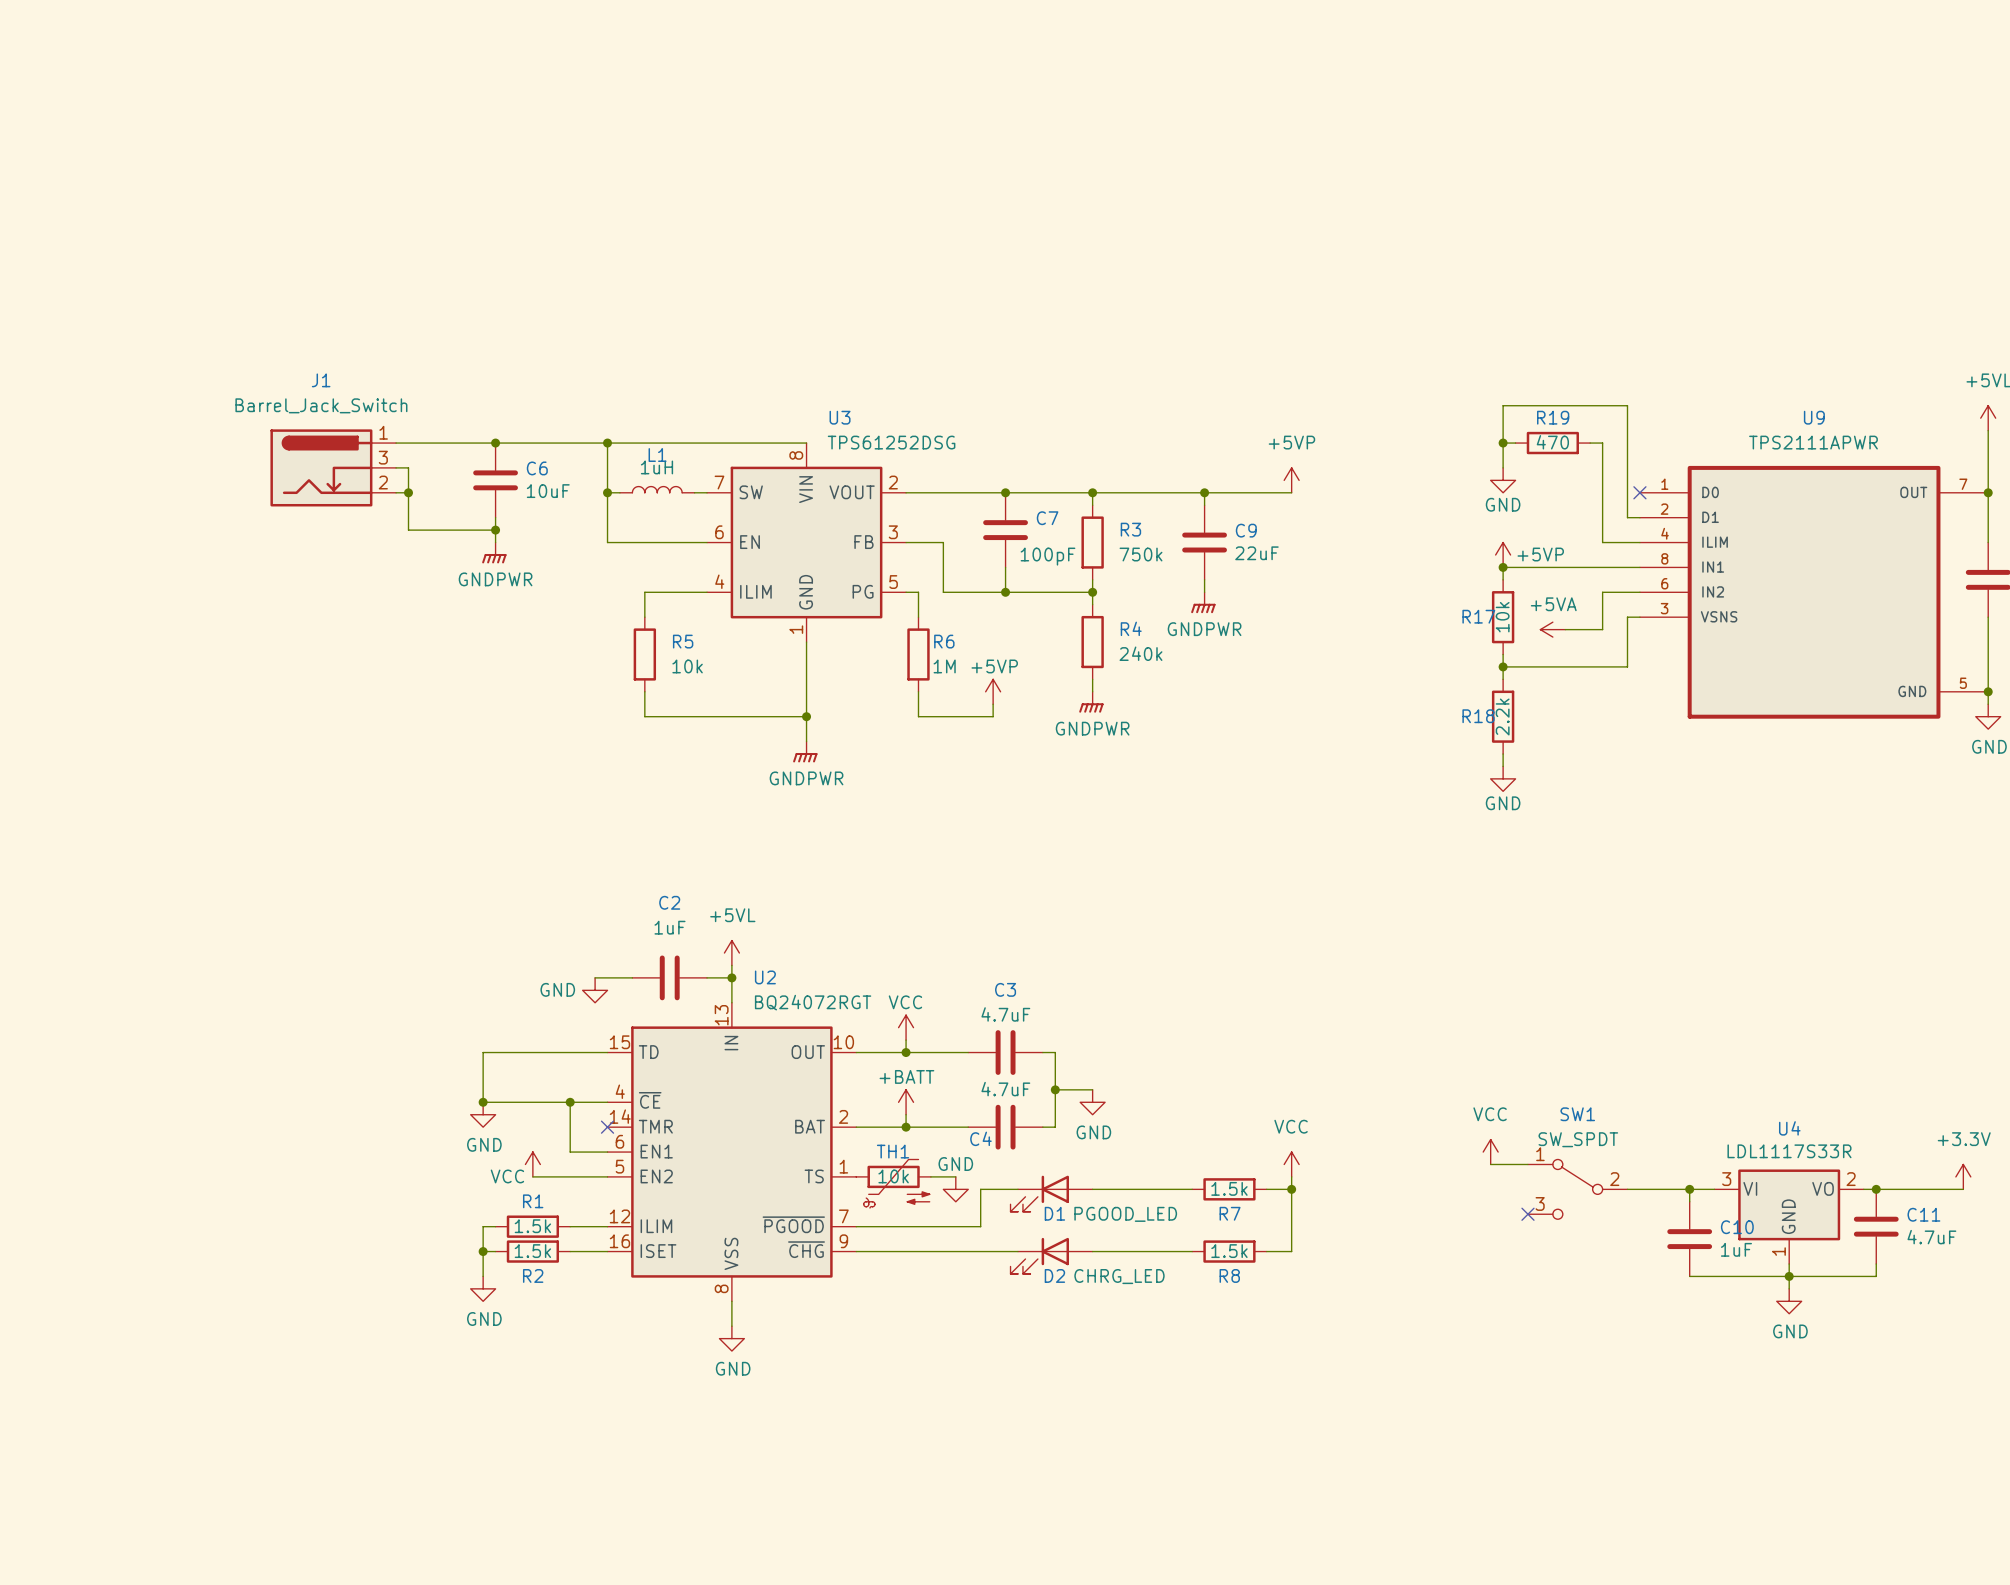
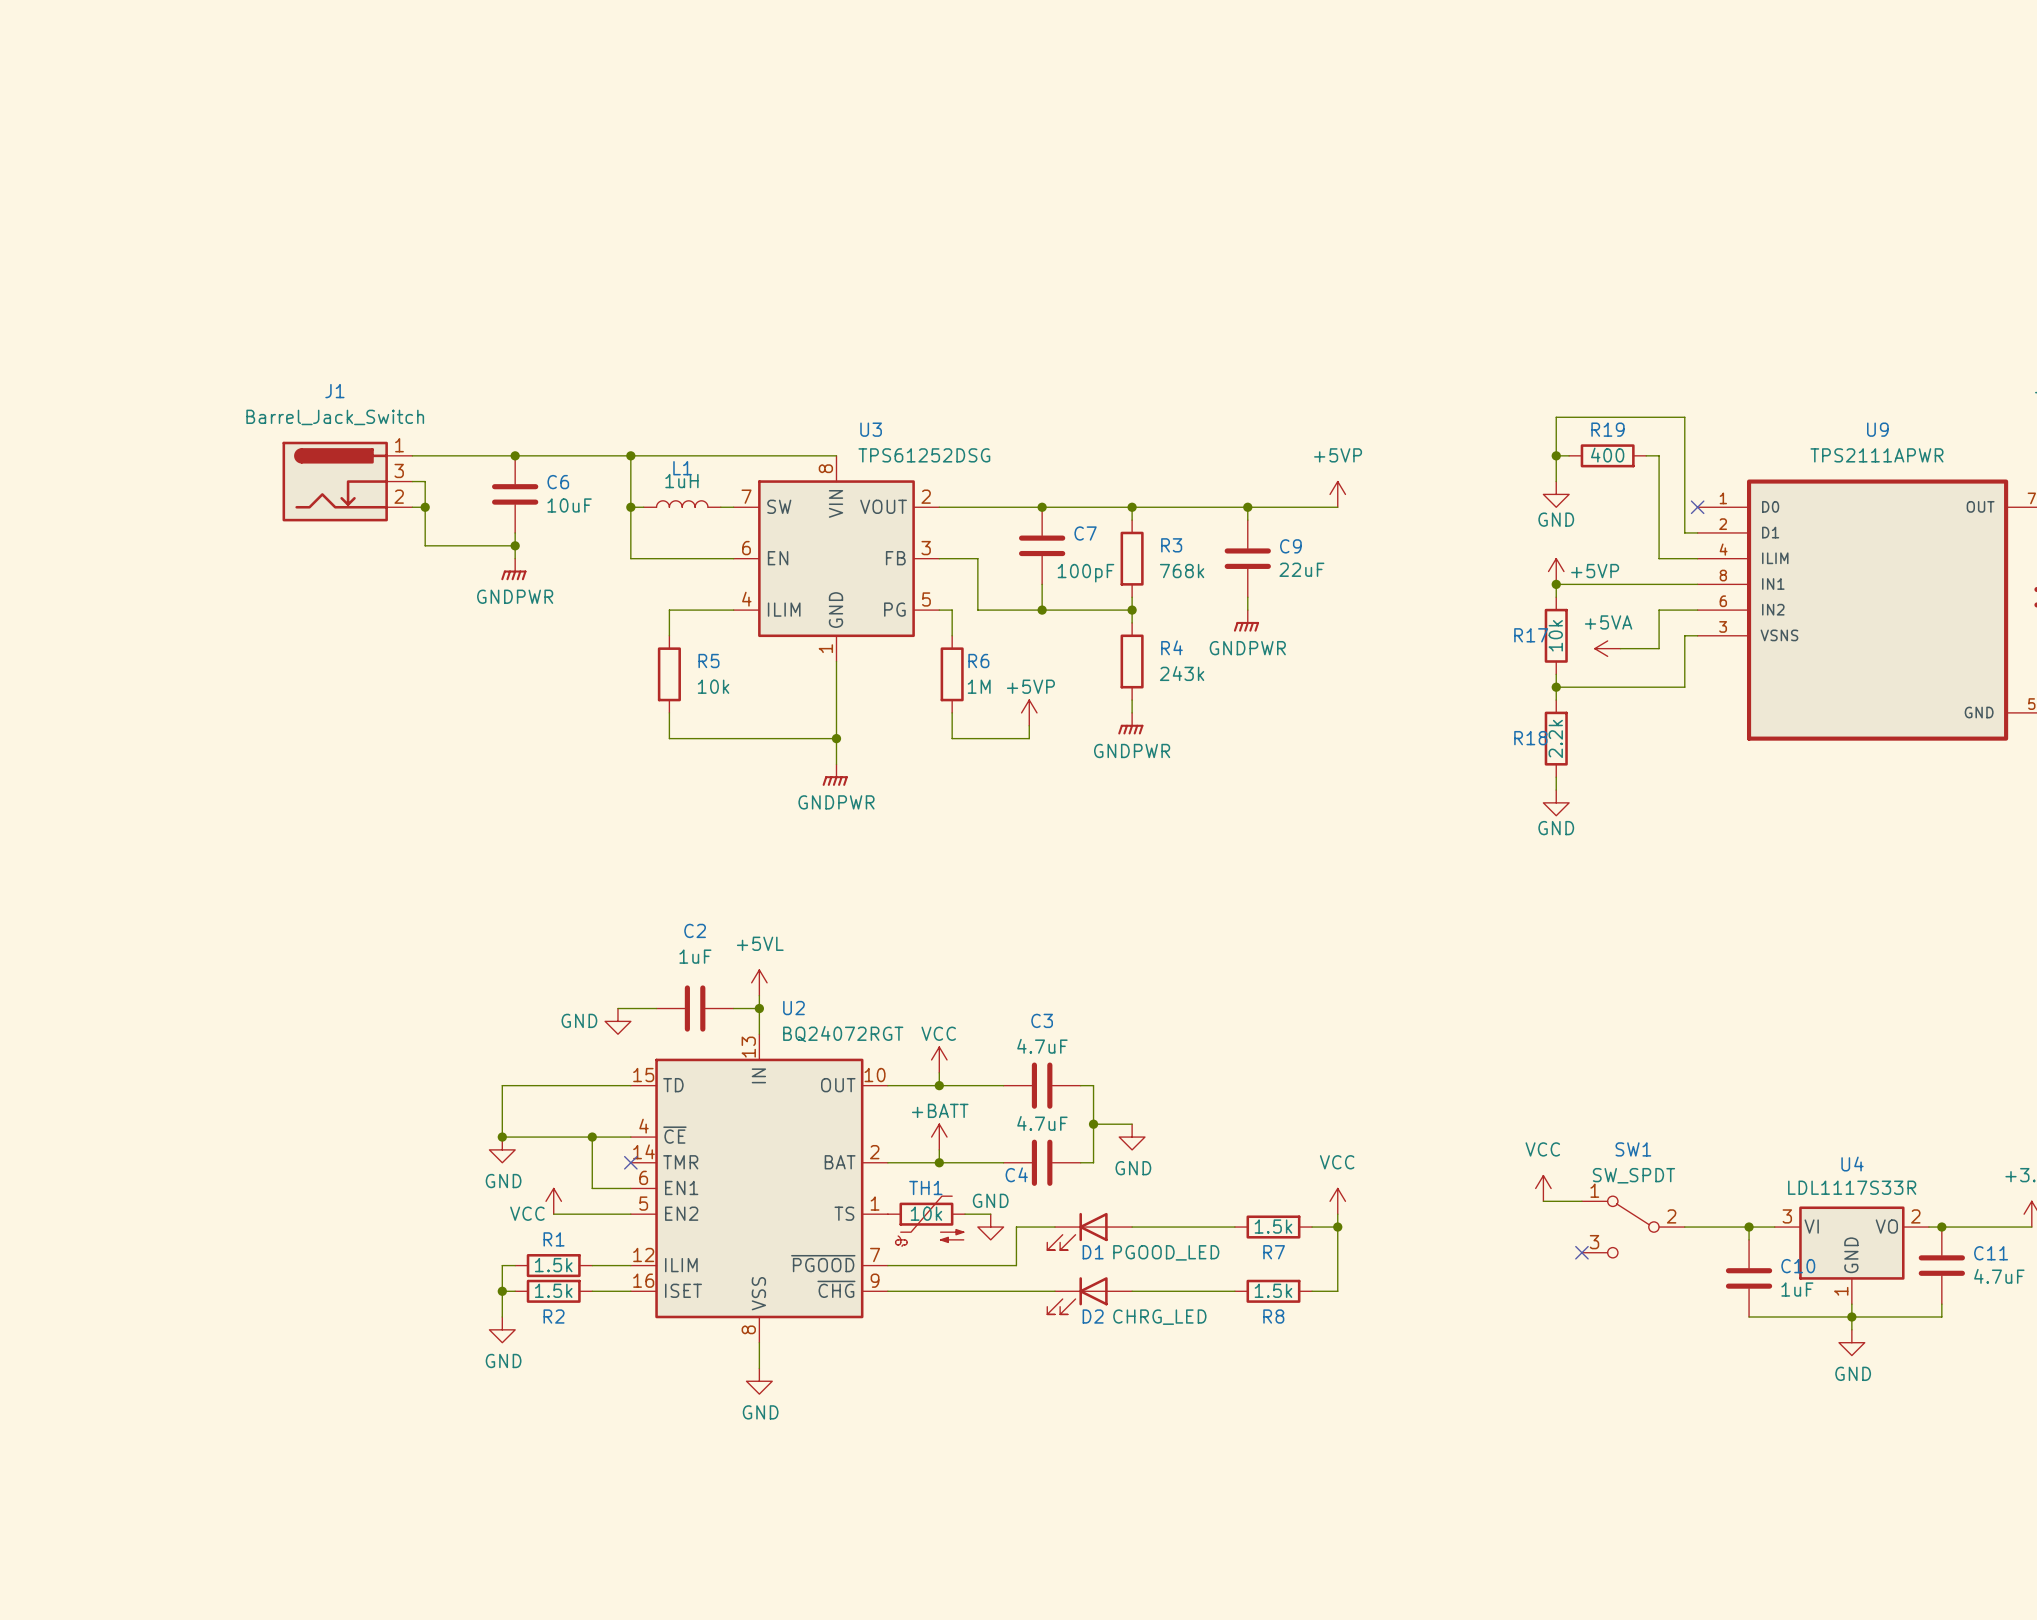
R19 value: 470 (1552, 442) -> 400 (1607, 455)
R3 value: 750k (1141, 554) -> 768k (1182, 571)
R4 value: 240k (1141, 653) -> 243k (1182, 673)

